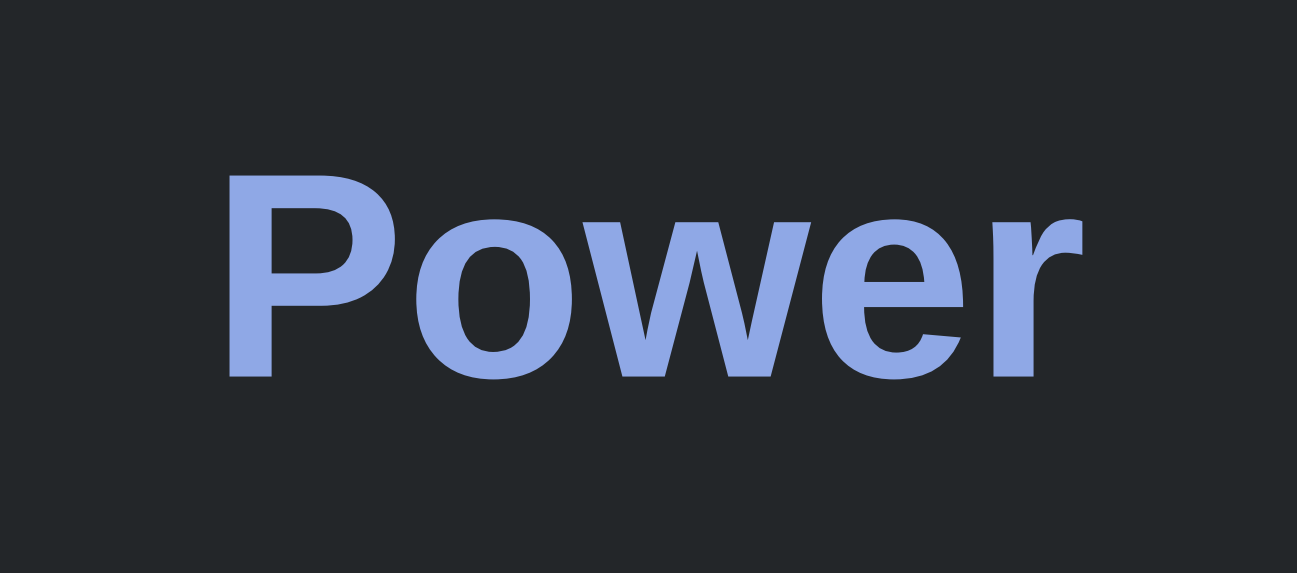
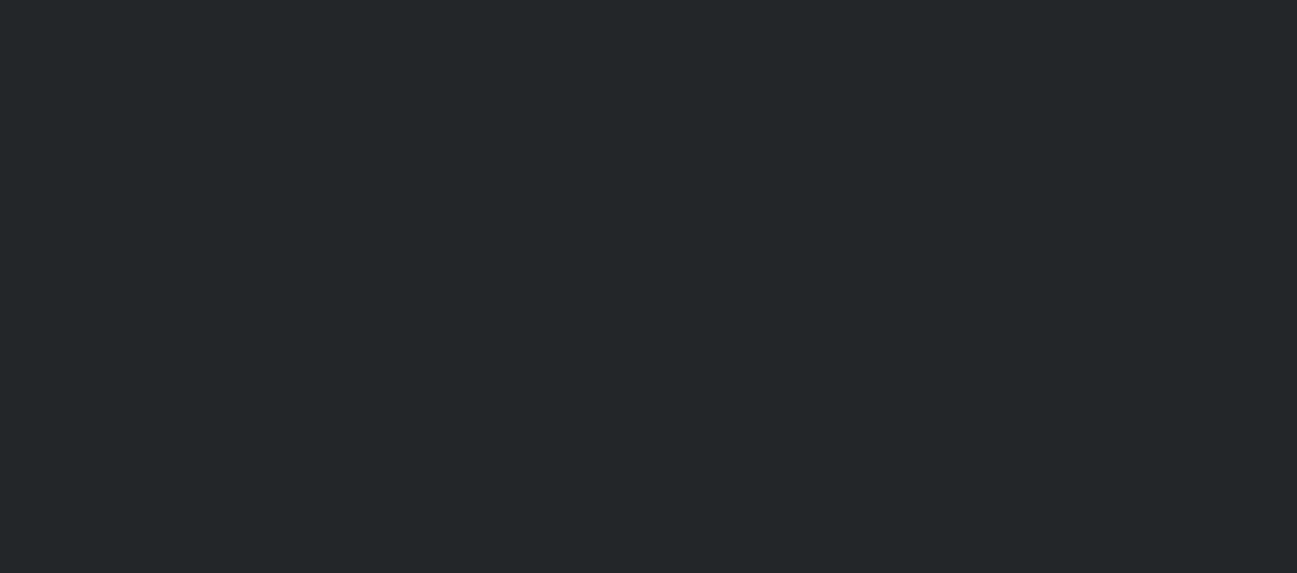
text: Power (655, 277) -> none

